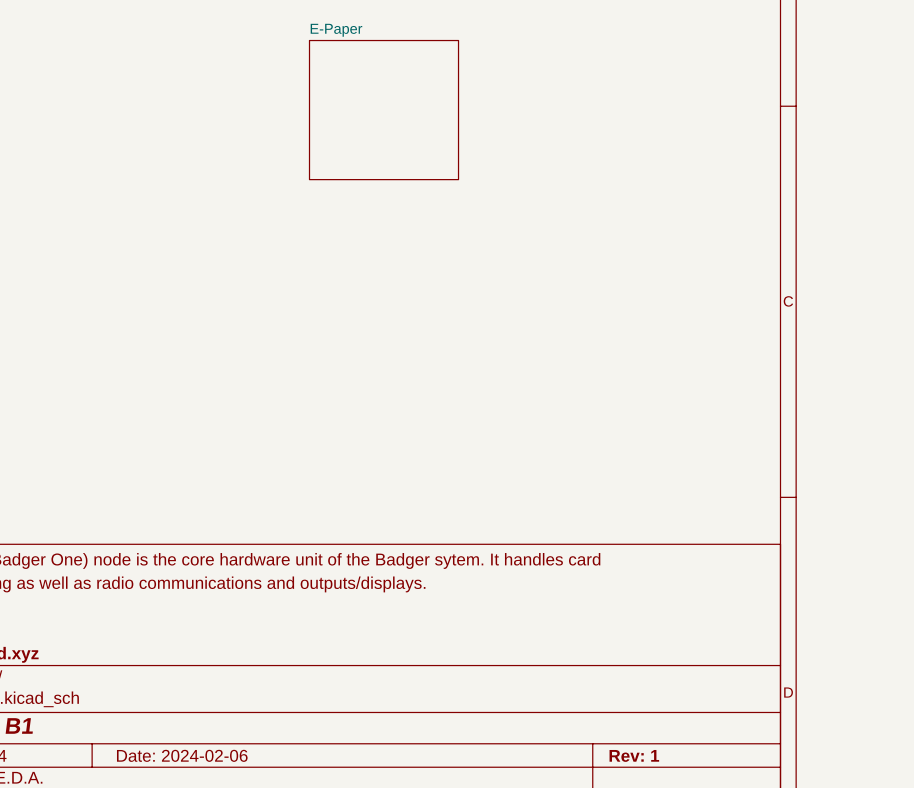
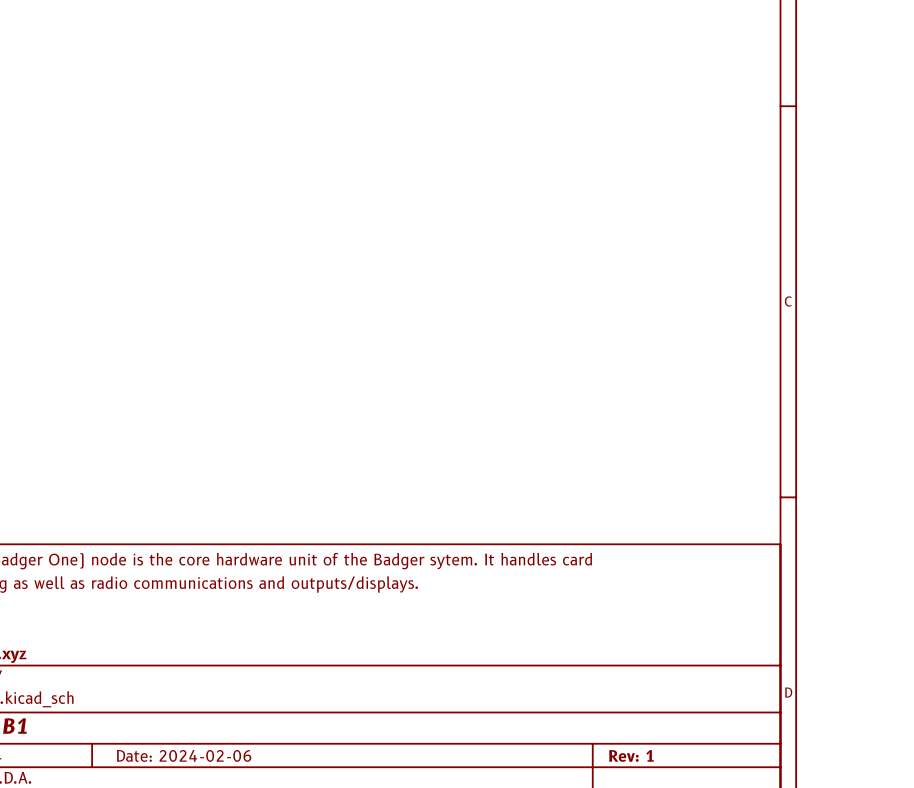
sheet E-Paper: (384, 110) -> none

